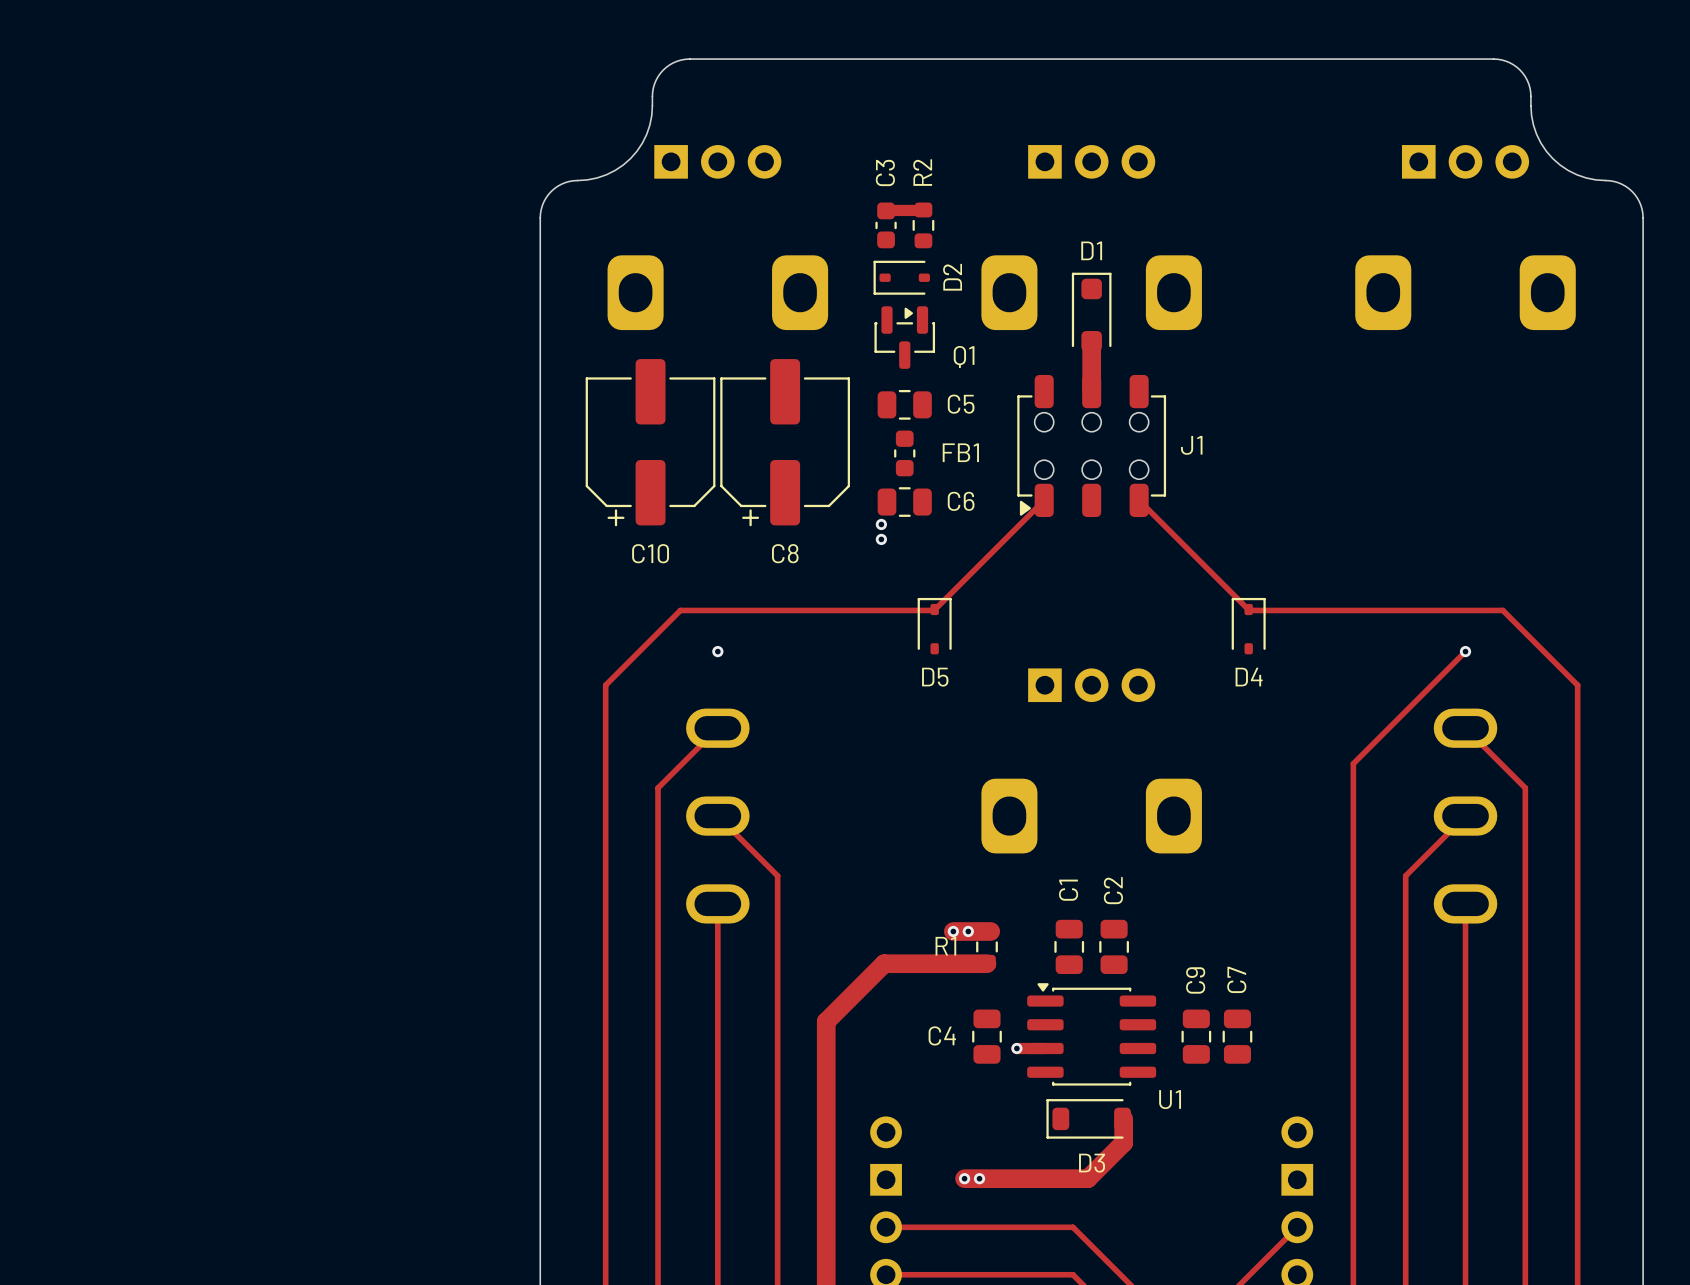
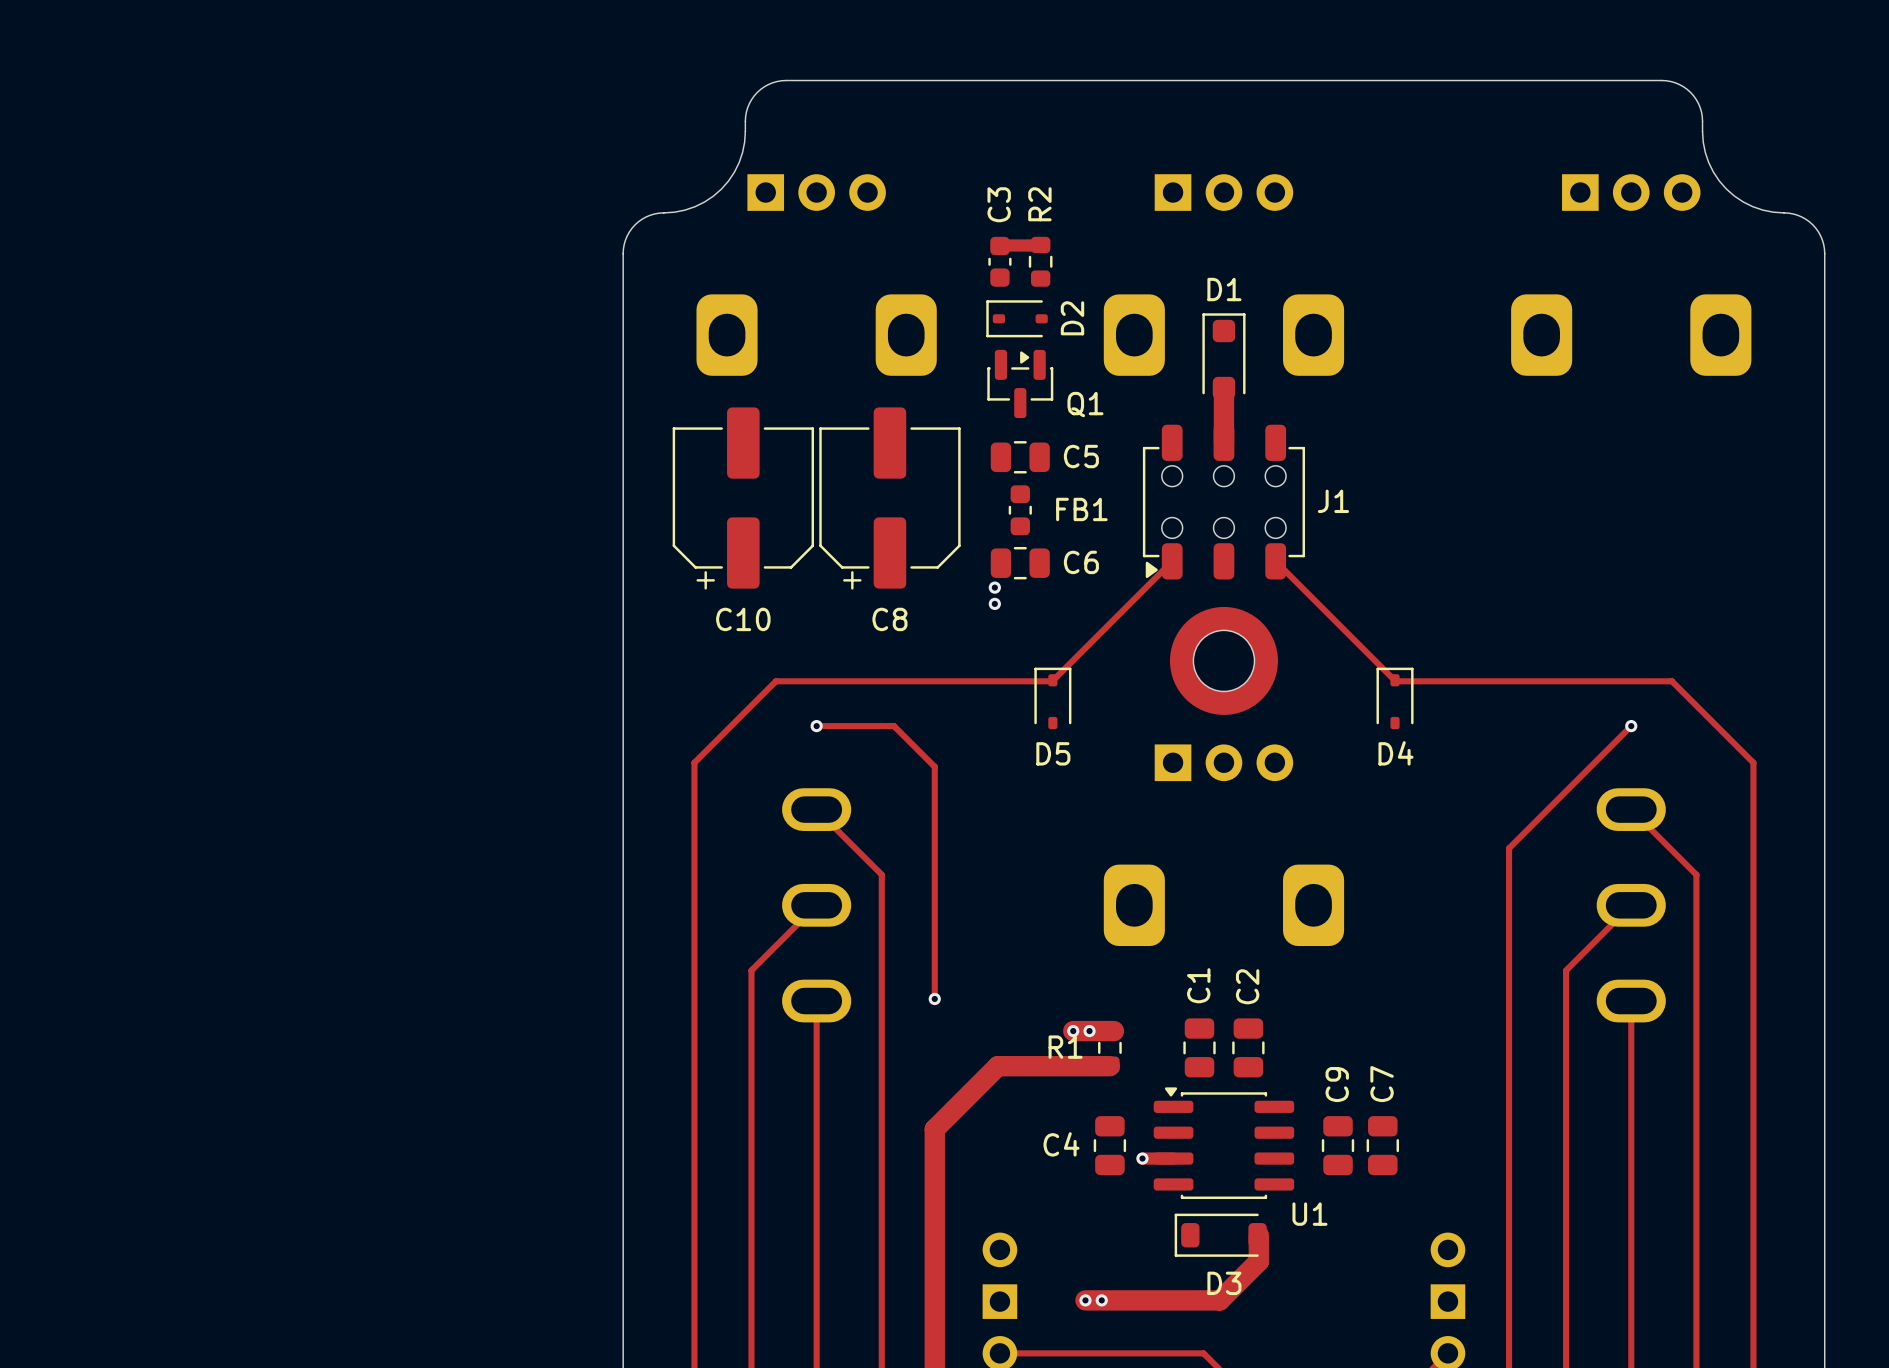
part: none -> (1223, 660)
track: none -> (816, 726) (894, 726) (934, 766) (934, 998)
track: (717, 728) (658, 788) (658, 875) -> (816, 905) (751, 970)
track: (717, 816) (777, 875) -> (816, 809) (881, 874) (881, 970)
via: none -> (934, 998)

